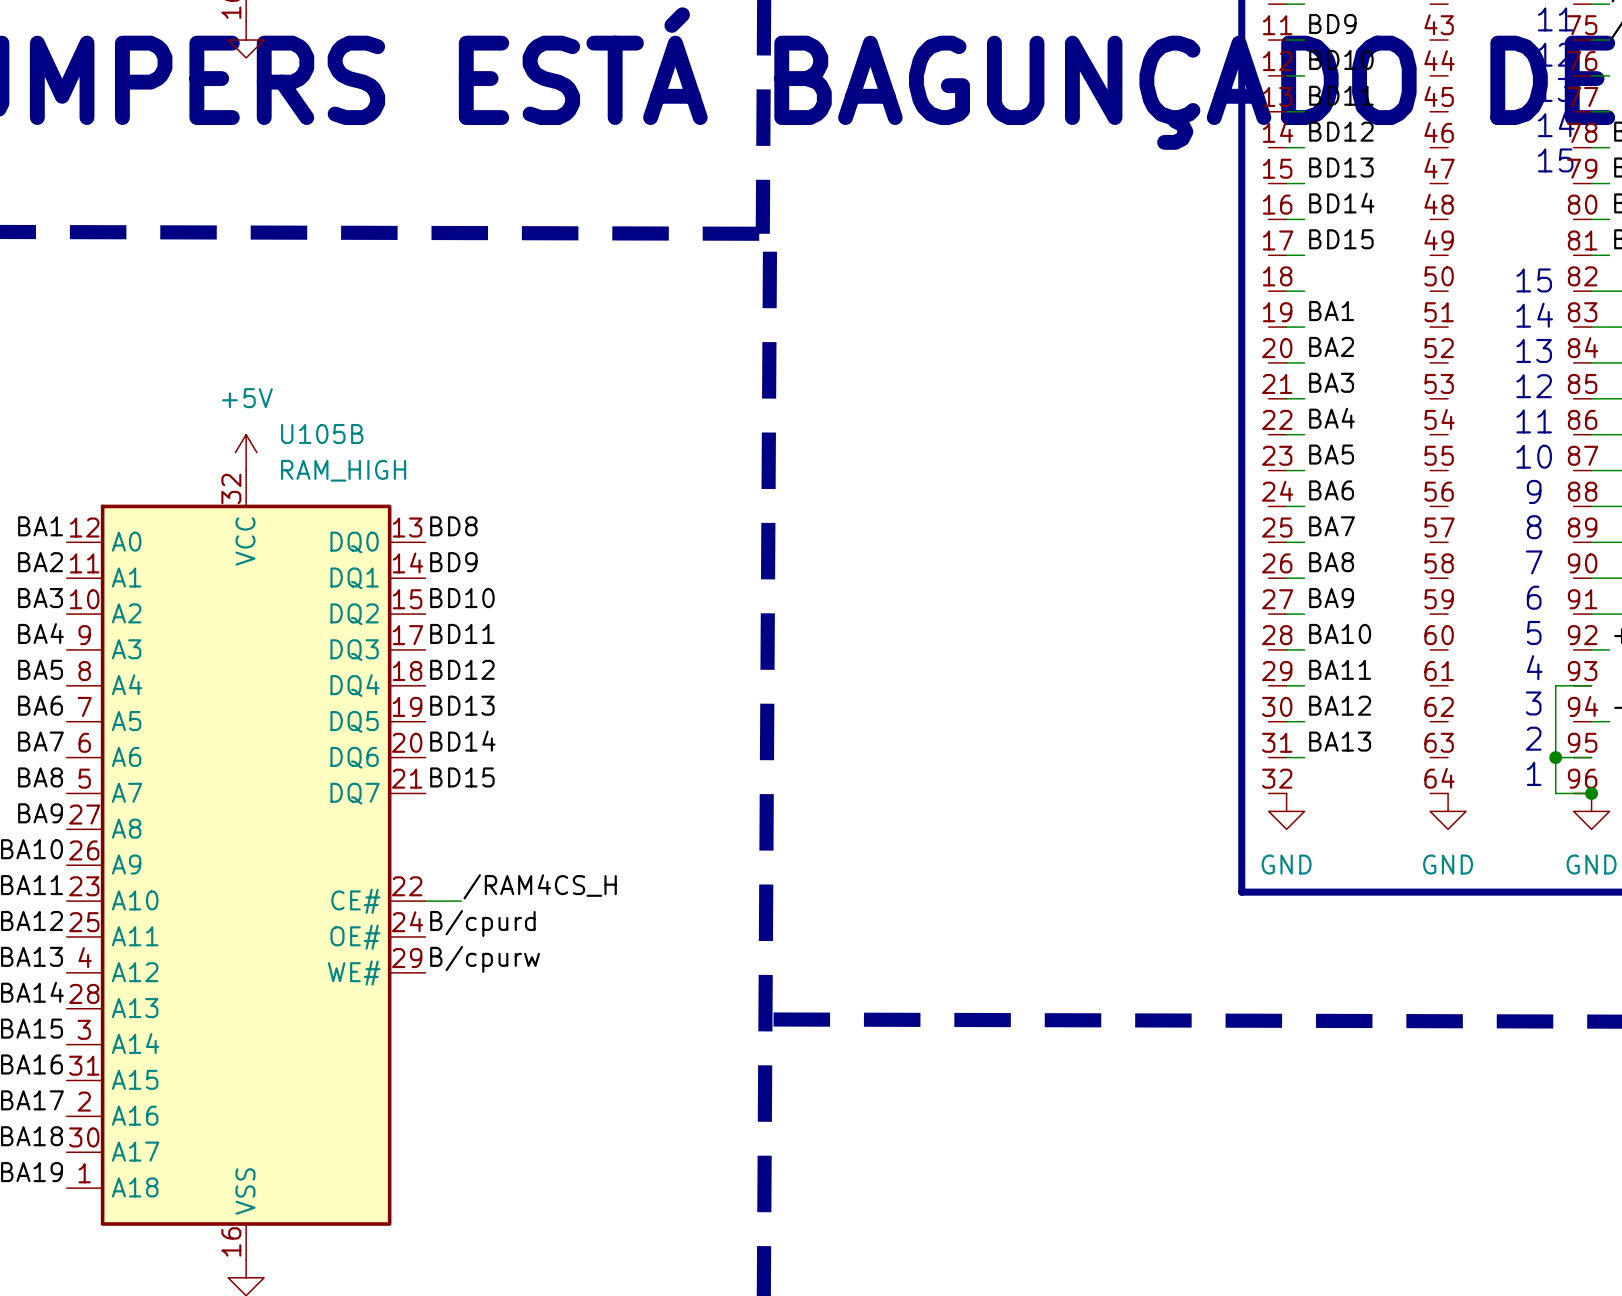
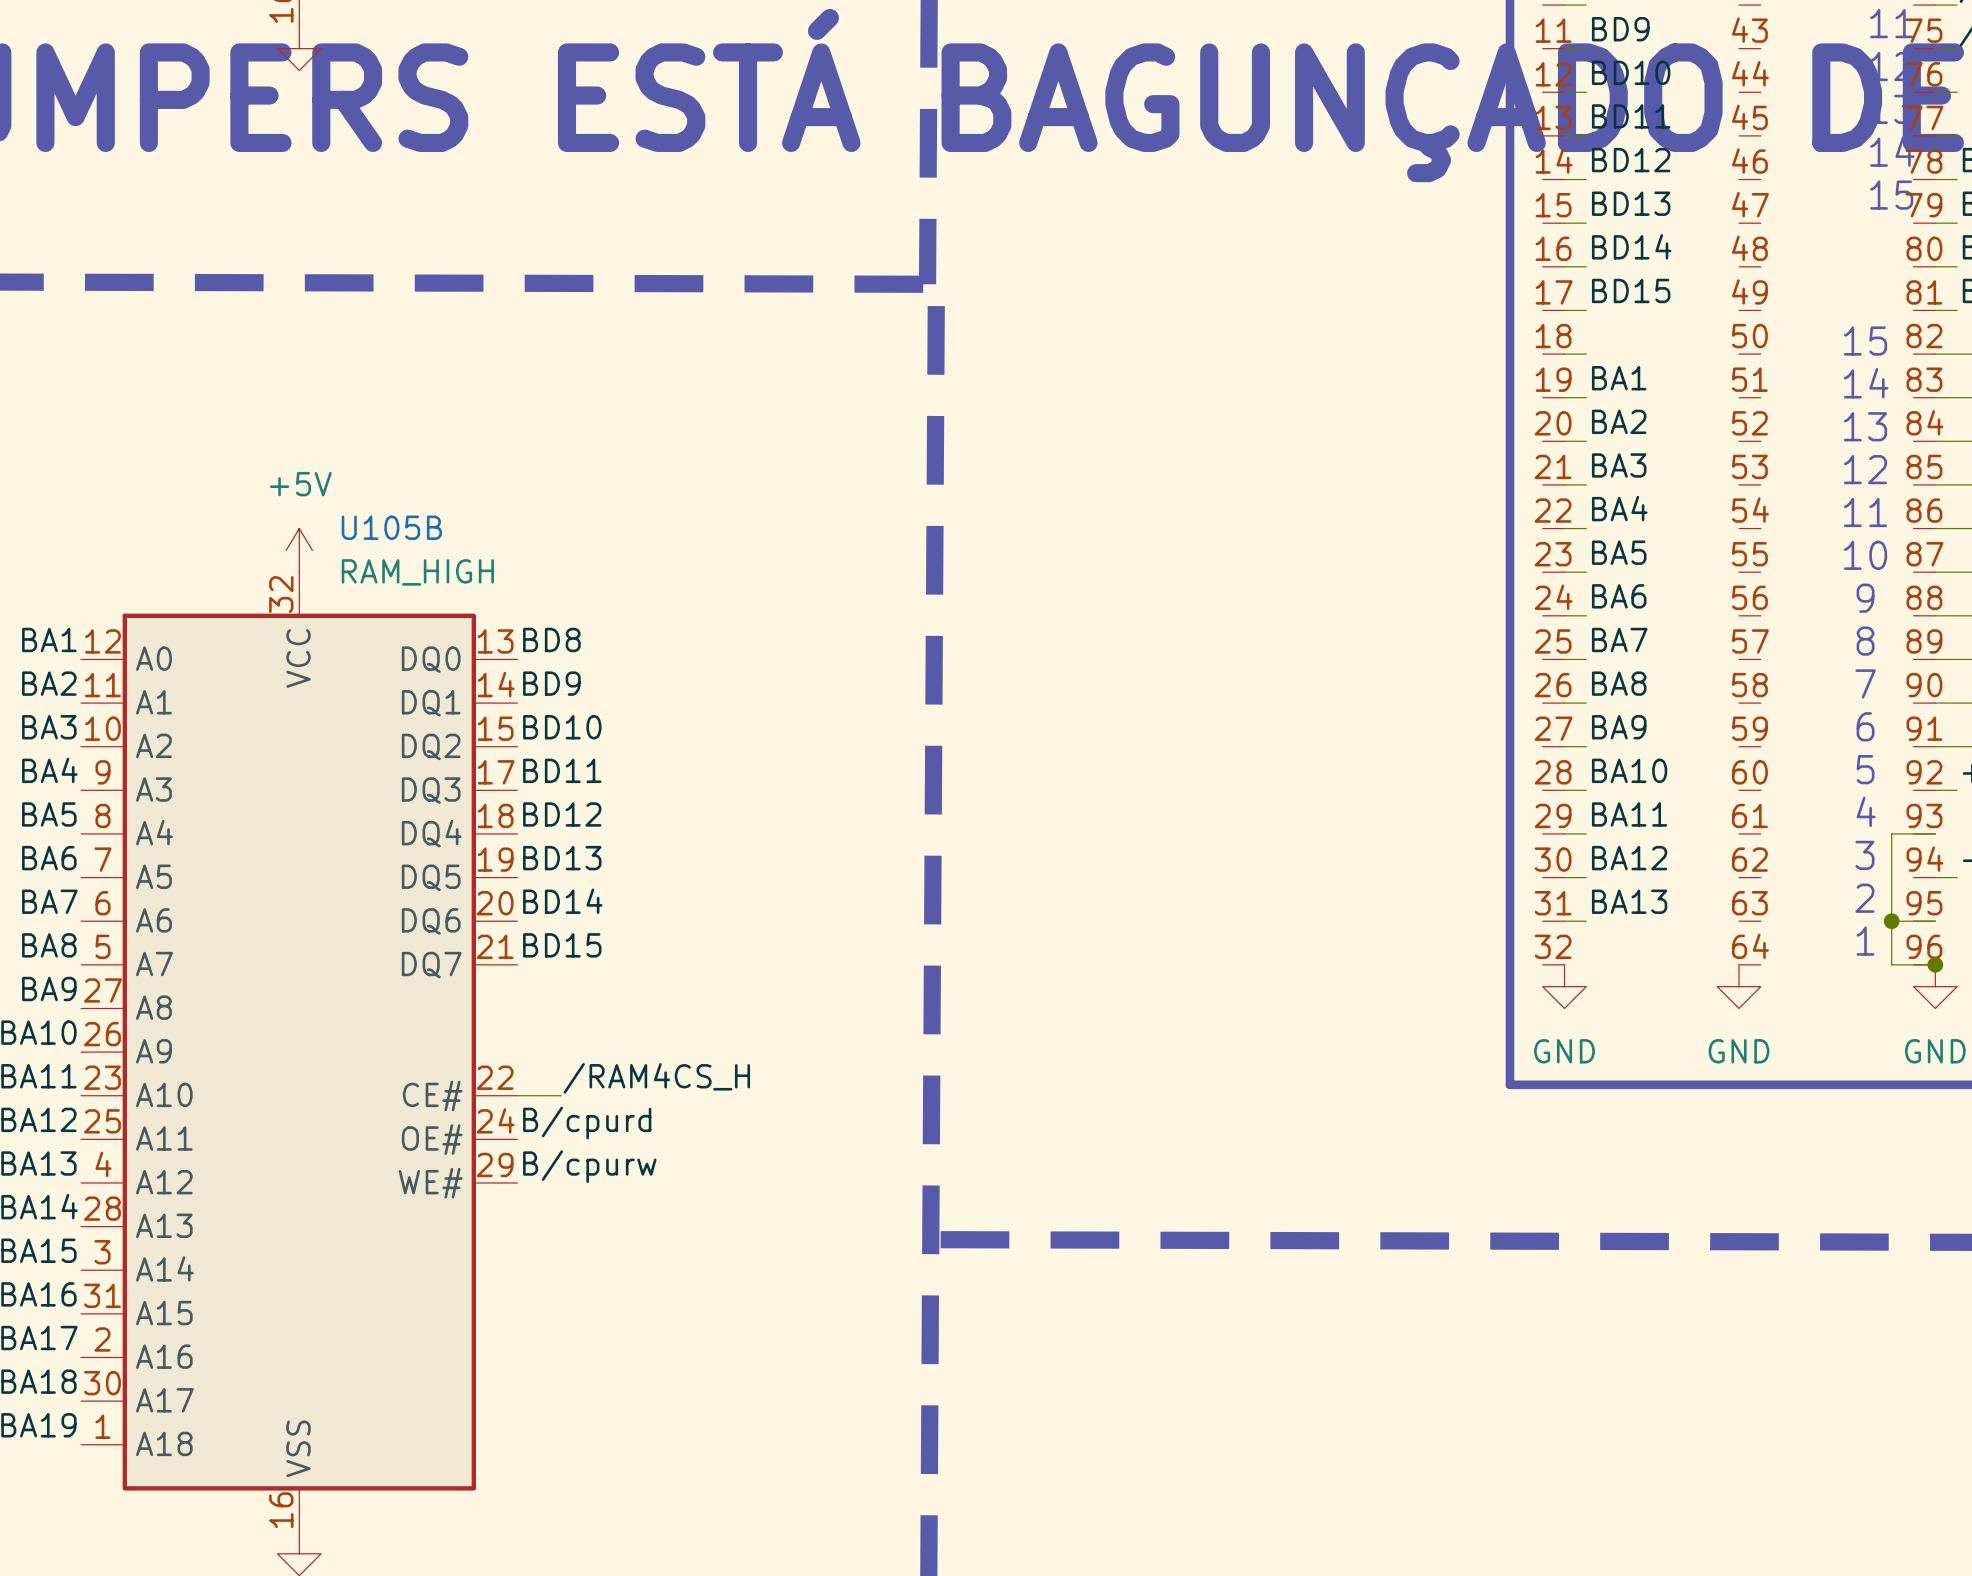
power symbol position: GND (1448, 811) -> GND (1739, 986)

